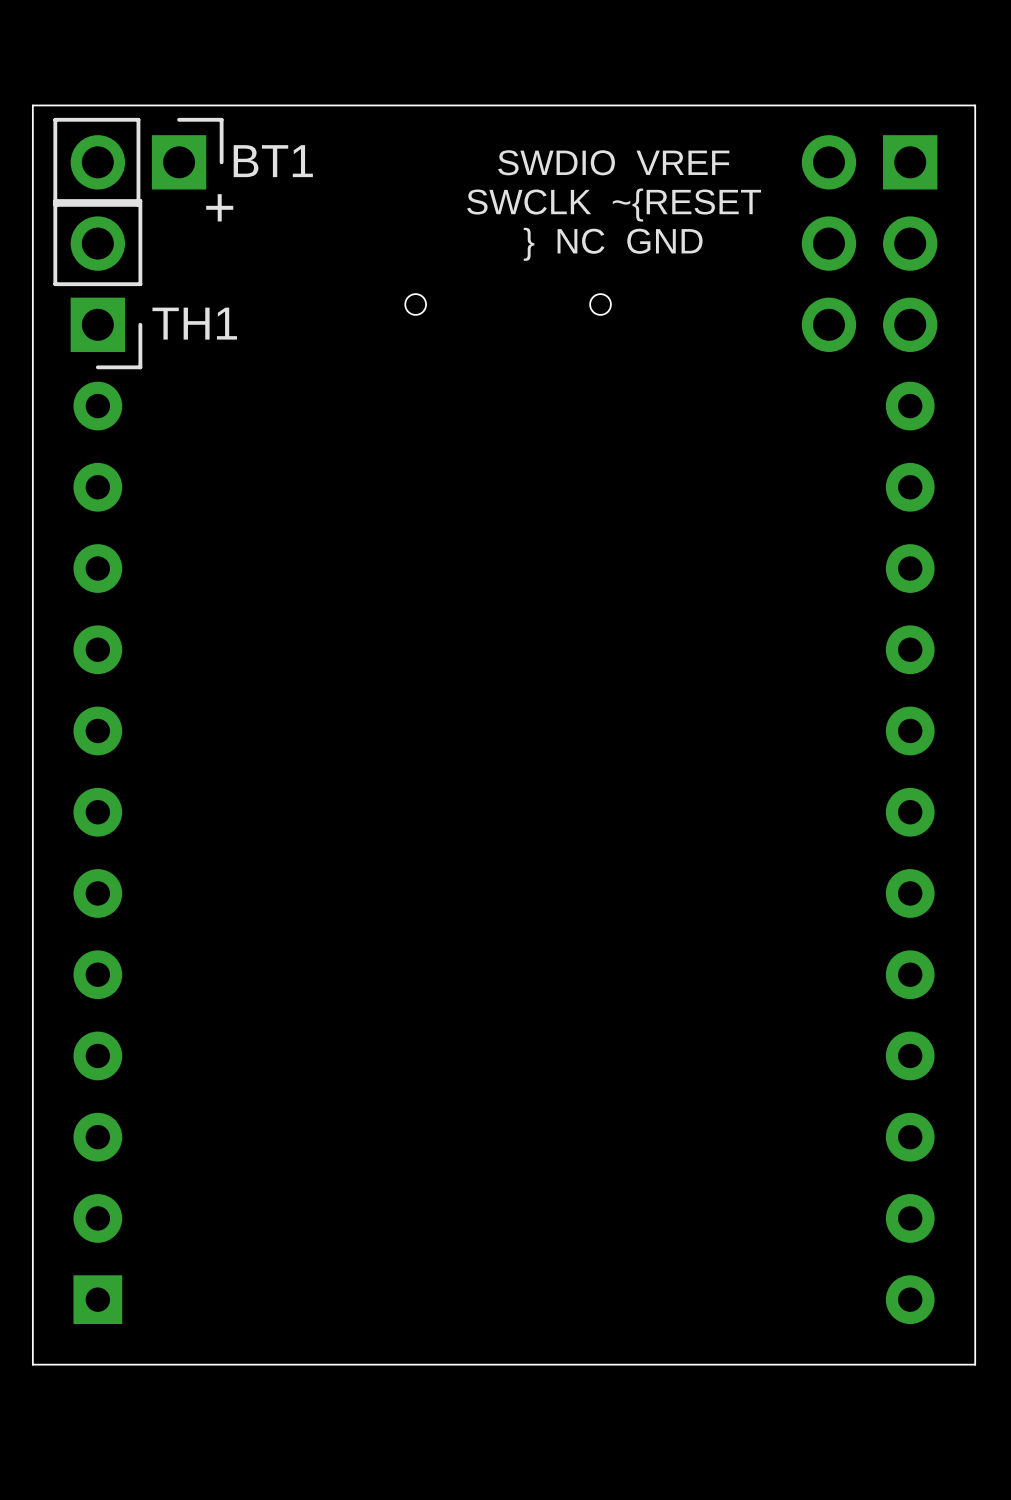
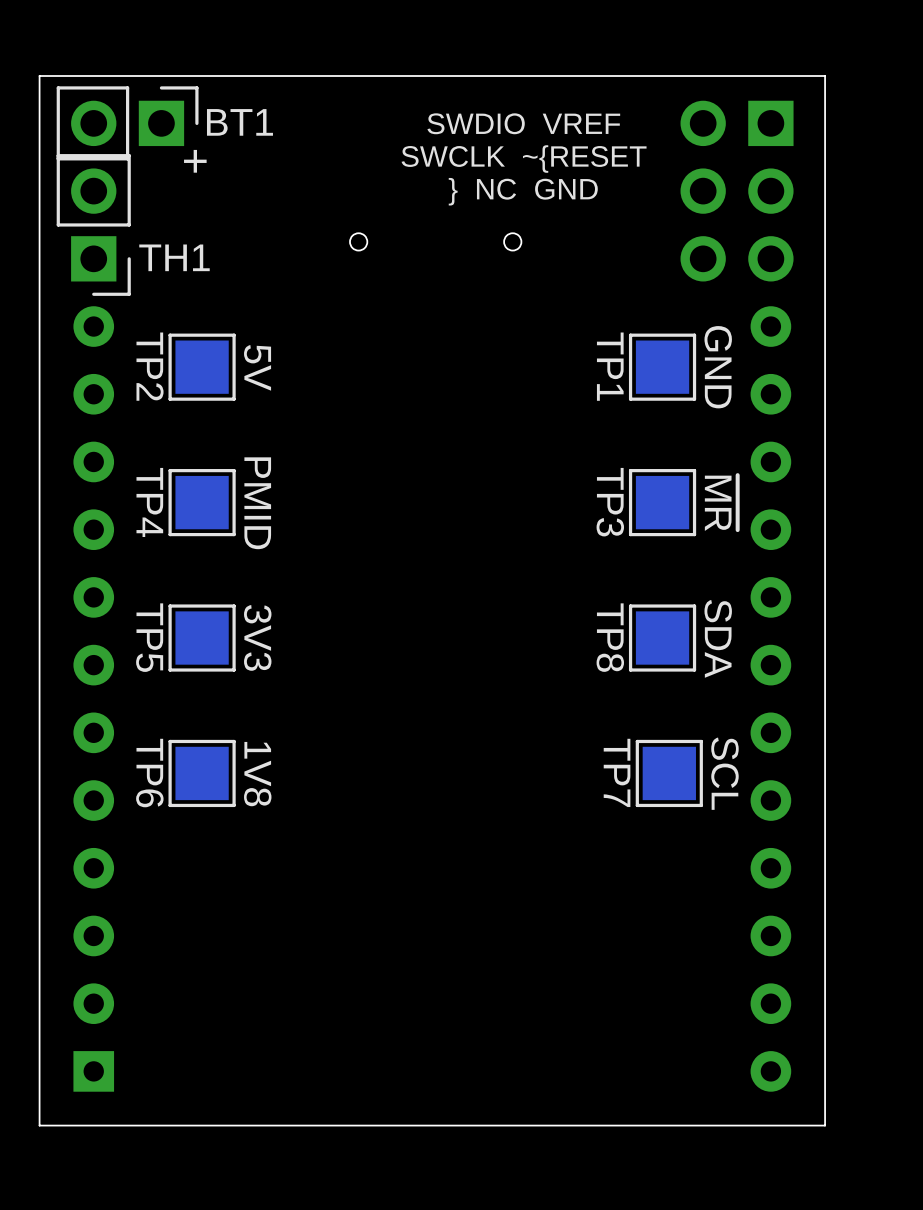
TP2: none -> 5V (202, 367)
TP1: none -> GND (662, 367)
TP4: none -> PMID (202, 502)
TP3: none -> ~{MR} (662, 502)
TP5: none -> 3V3 (202, 638)
TP8: none -> SDA (662, 638)
TP6: none -> 1V8 (202, 773)
TP7: none -> SCL (669, 773)

